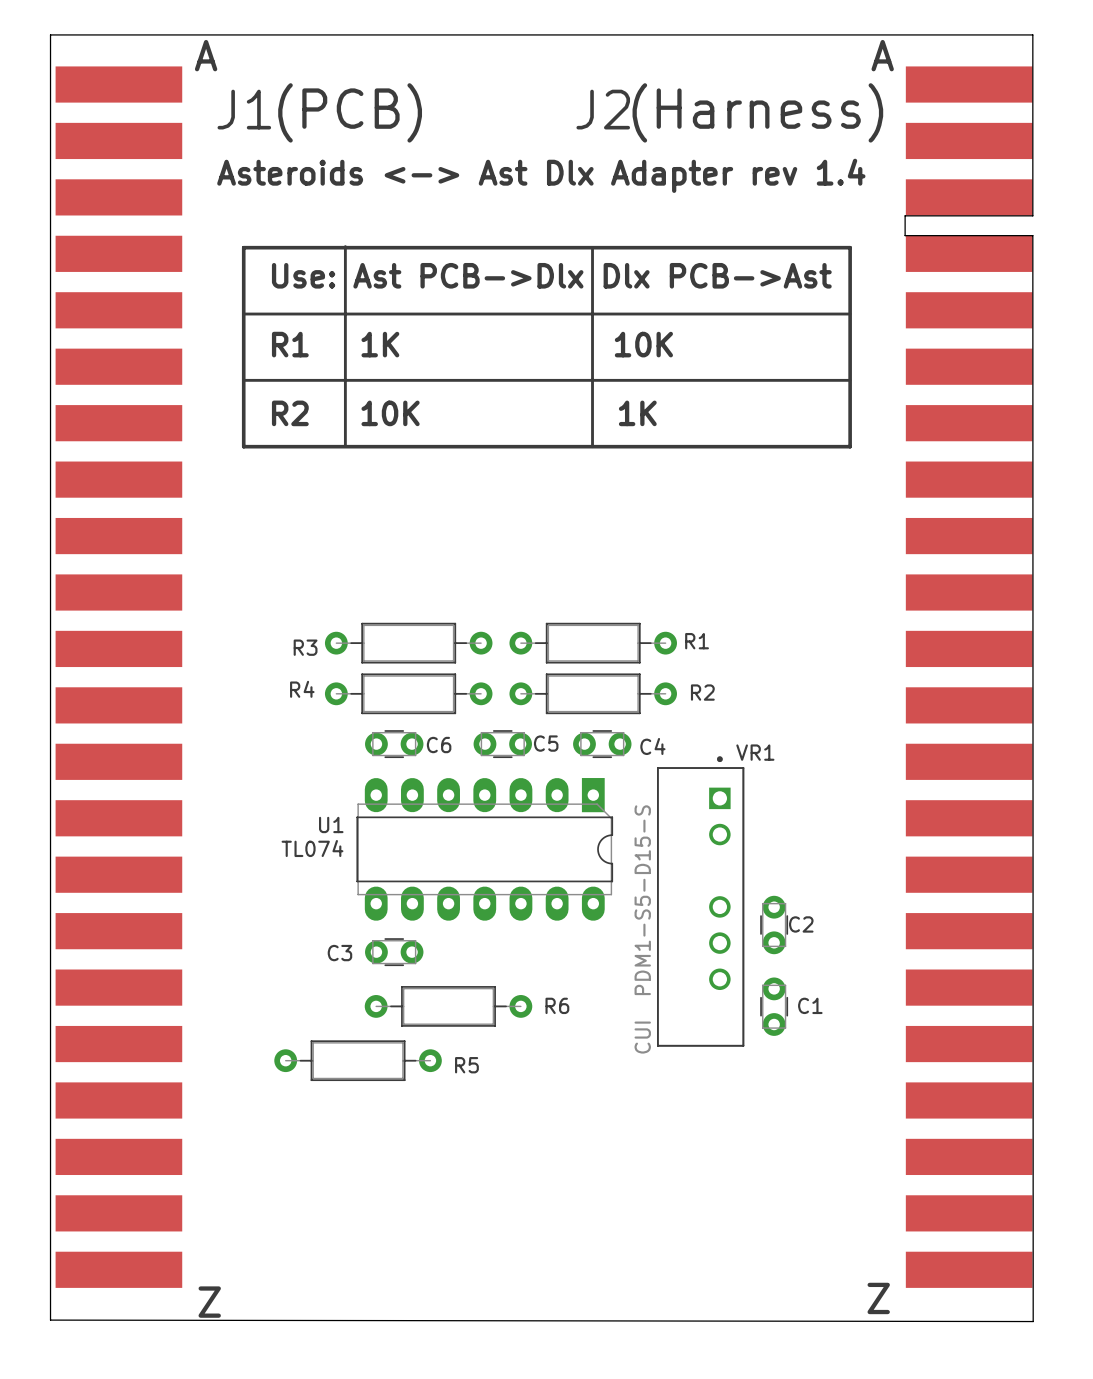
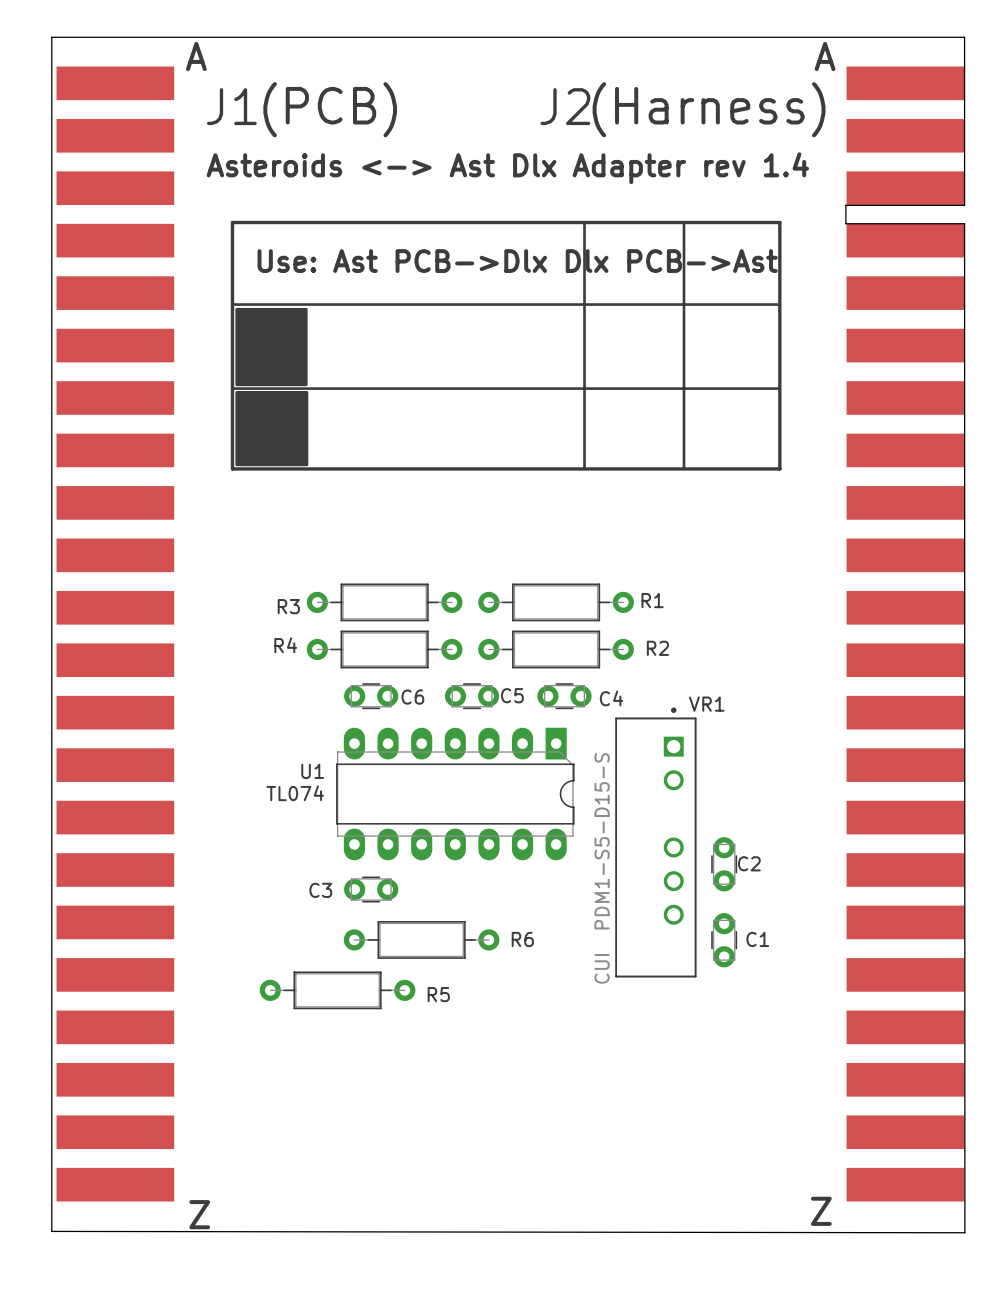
line: none -> (584, 222) (584, 468)
line: none -> (684, 222) (684, 468)
line: (345, 246) (345, 445) -> none
line: (243, 247) (850, 247) (850, 446) (243, 446) (243, 247) -> (232, 222) (232, 468) (779, 468) (779, 222) (232, 222)
line: (592, 247) (592, 446) -> none
line: (243, 314) (850, 314) -> none
line: none -> (232, 304) (779, 304)
drawing: none -> [235, 307, 309, 467]
text: R1 1K 10K (472, 344) -> none
line: (243, 380) (850, 380) -> none
line: none -> (232, 388) (779, 388)
text: R2 10K 1K (464, 413) -> none

